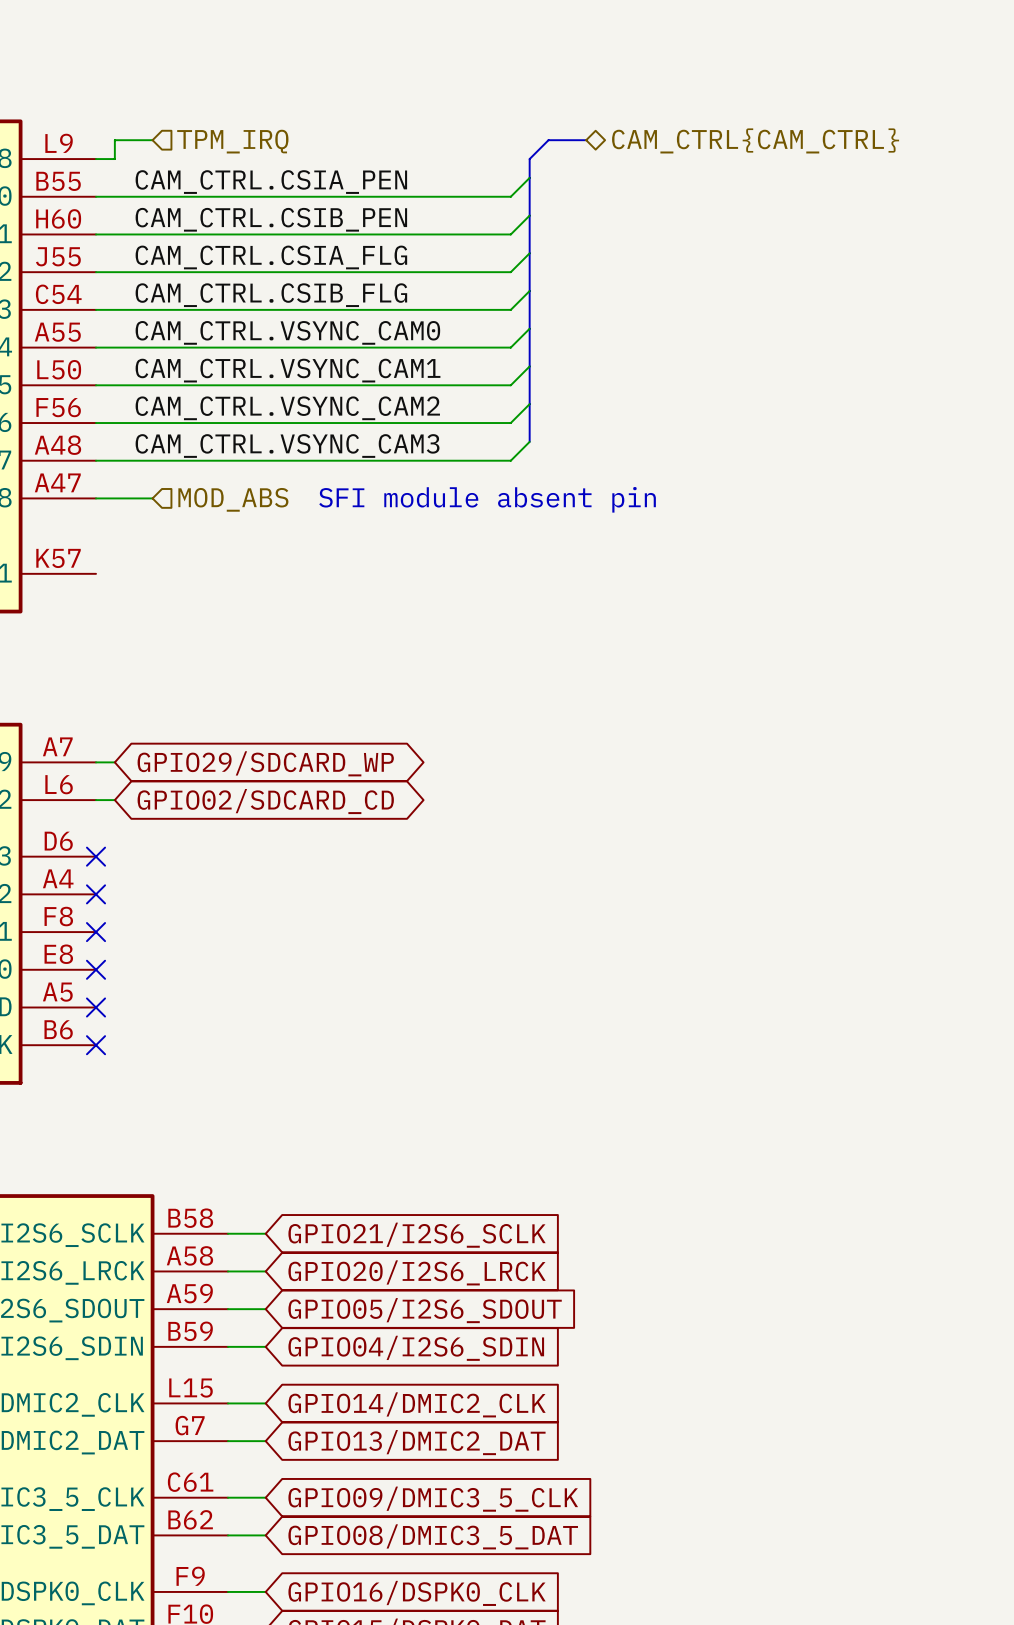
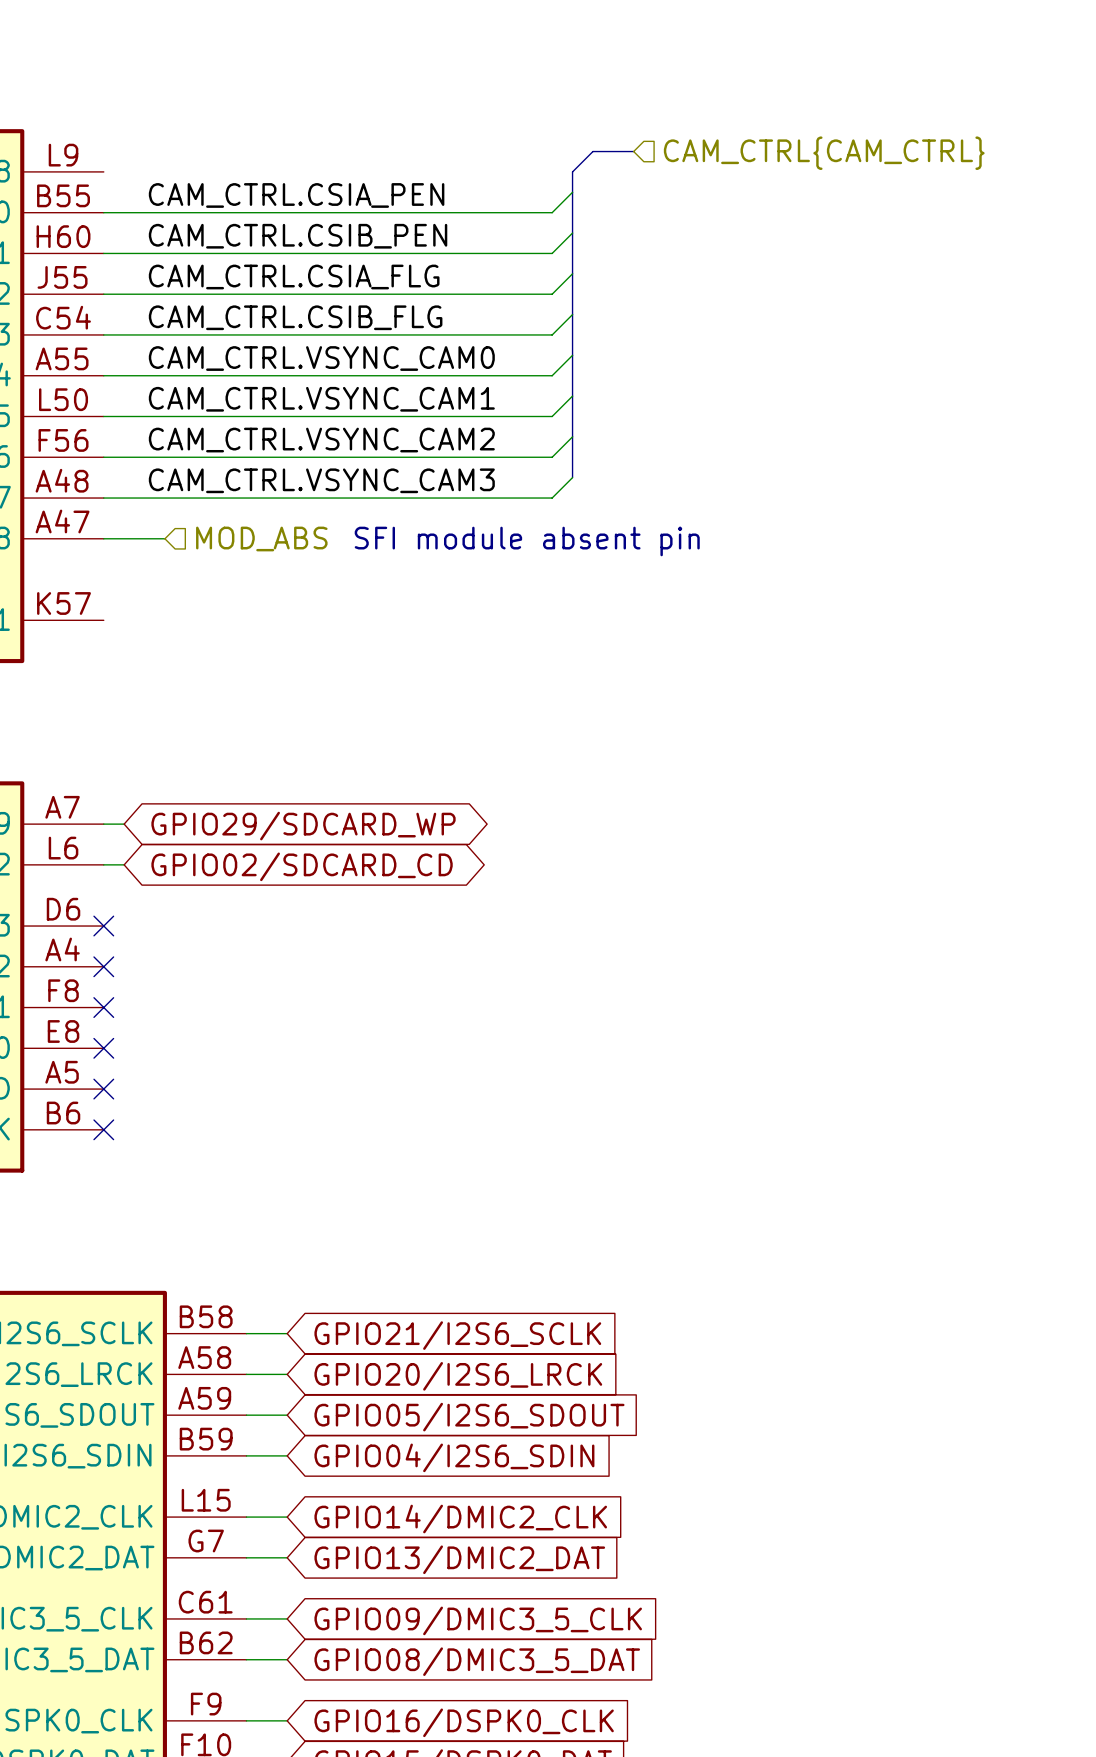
wire: (152, 140) (114, 140) (114, 159) (96, 159) -> none
hierarchical label shape: bidirectional (755, 140) -> input (824, 153)
hierarchical label: TPM_IRQ (232, 141) -> none

